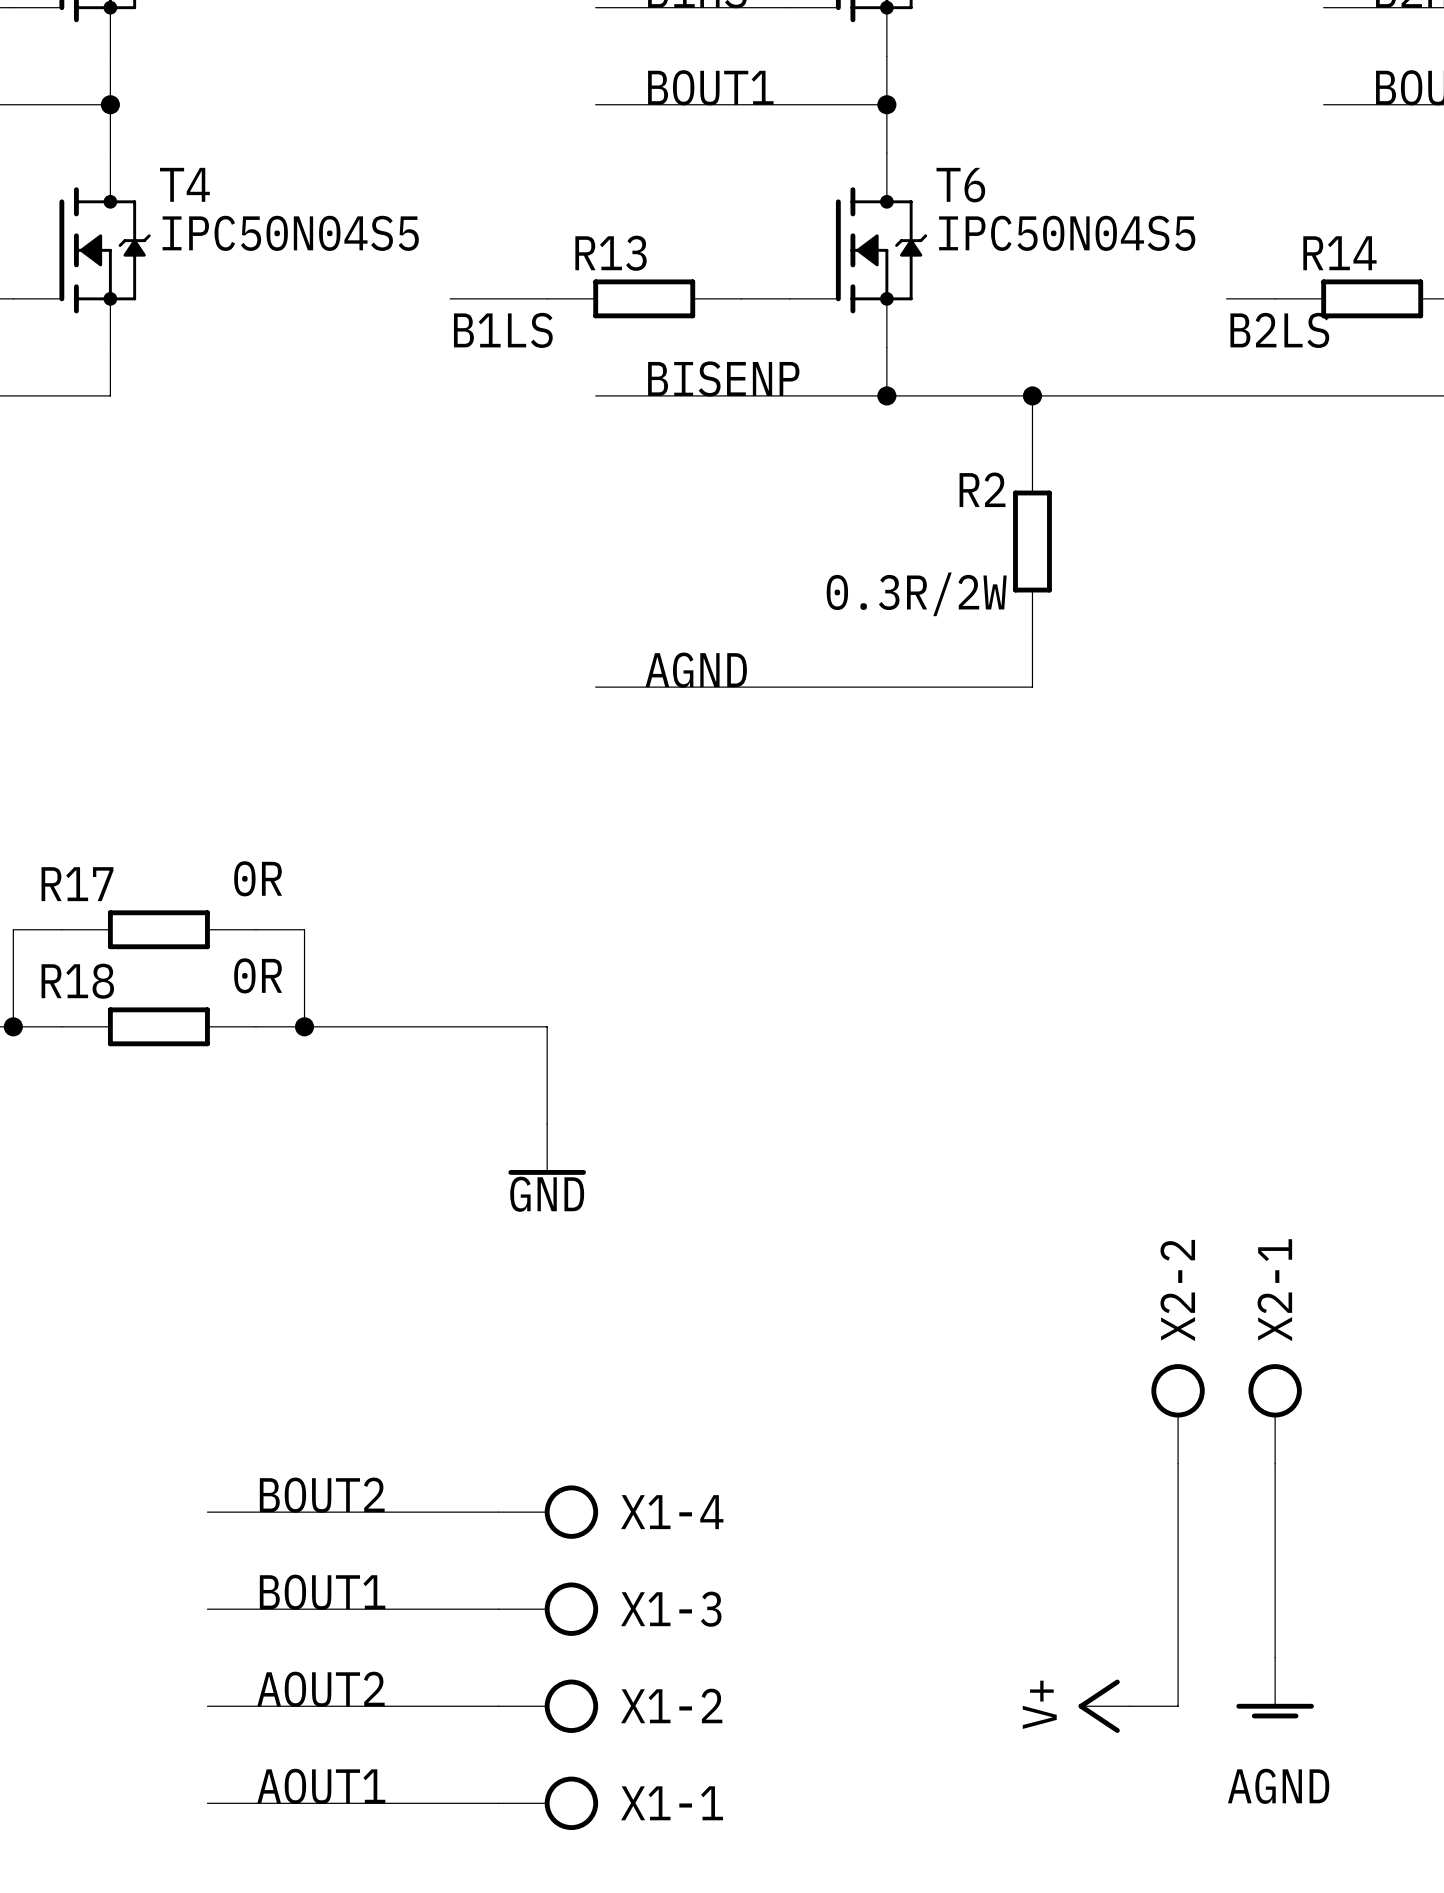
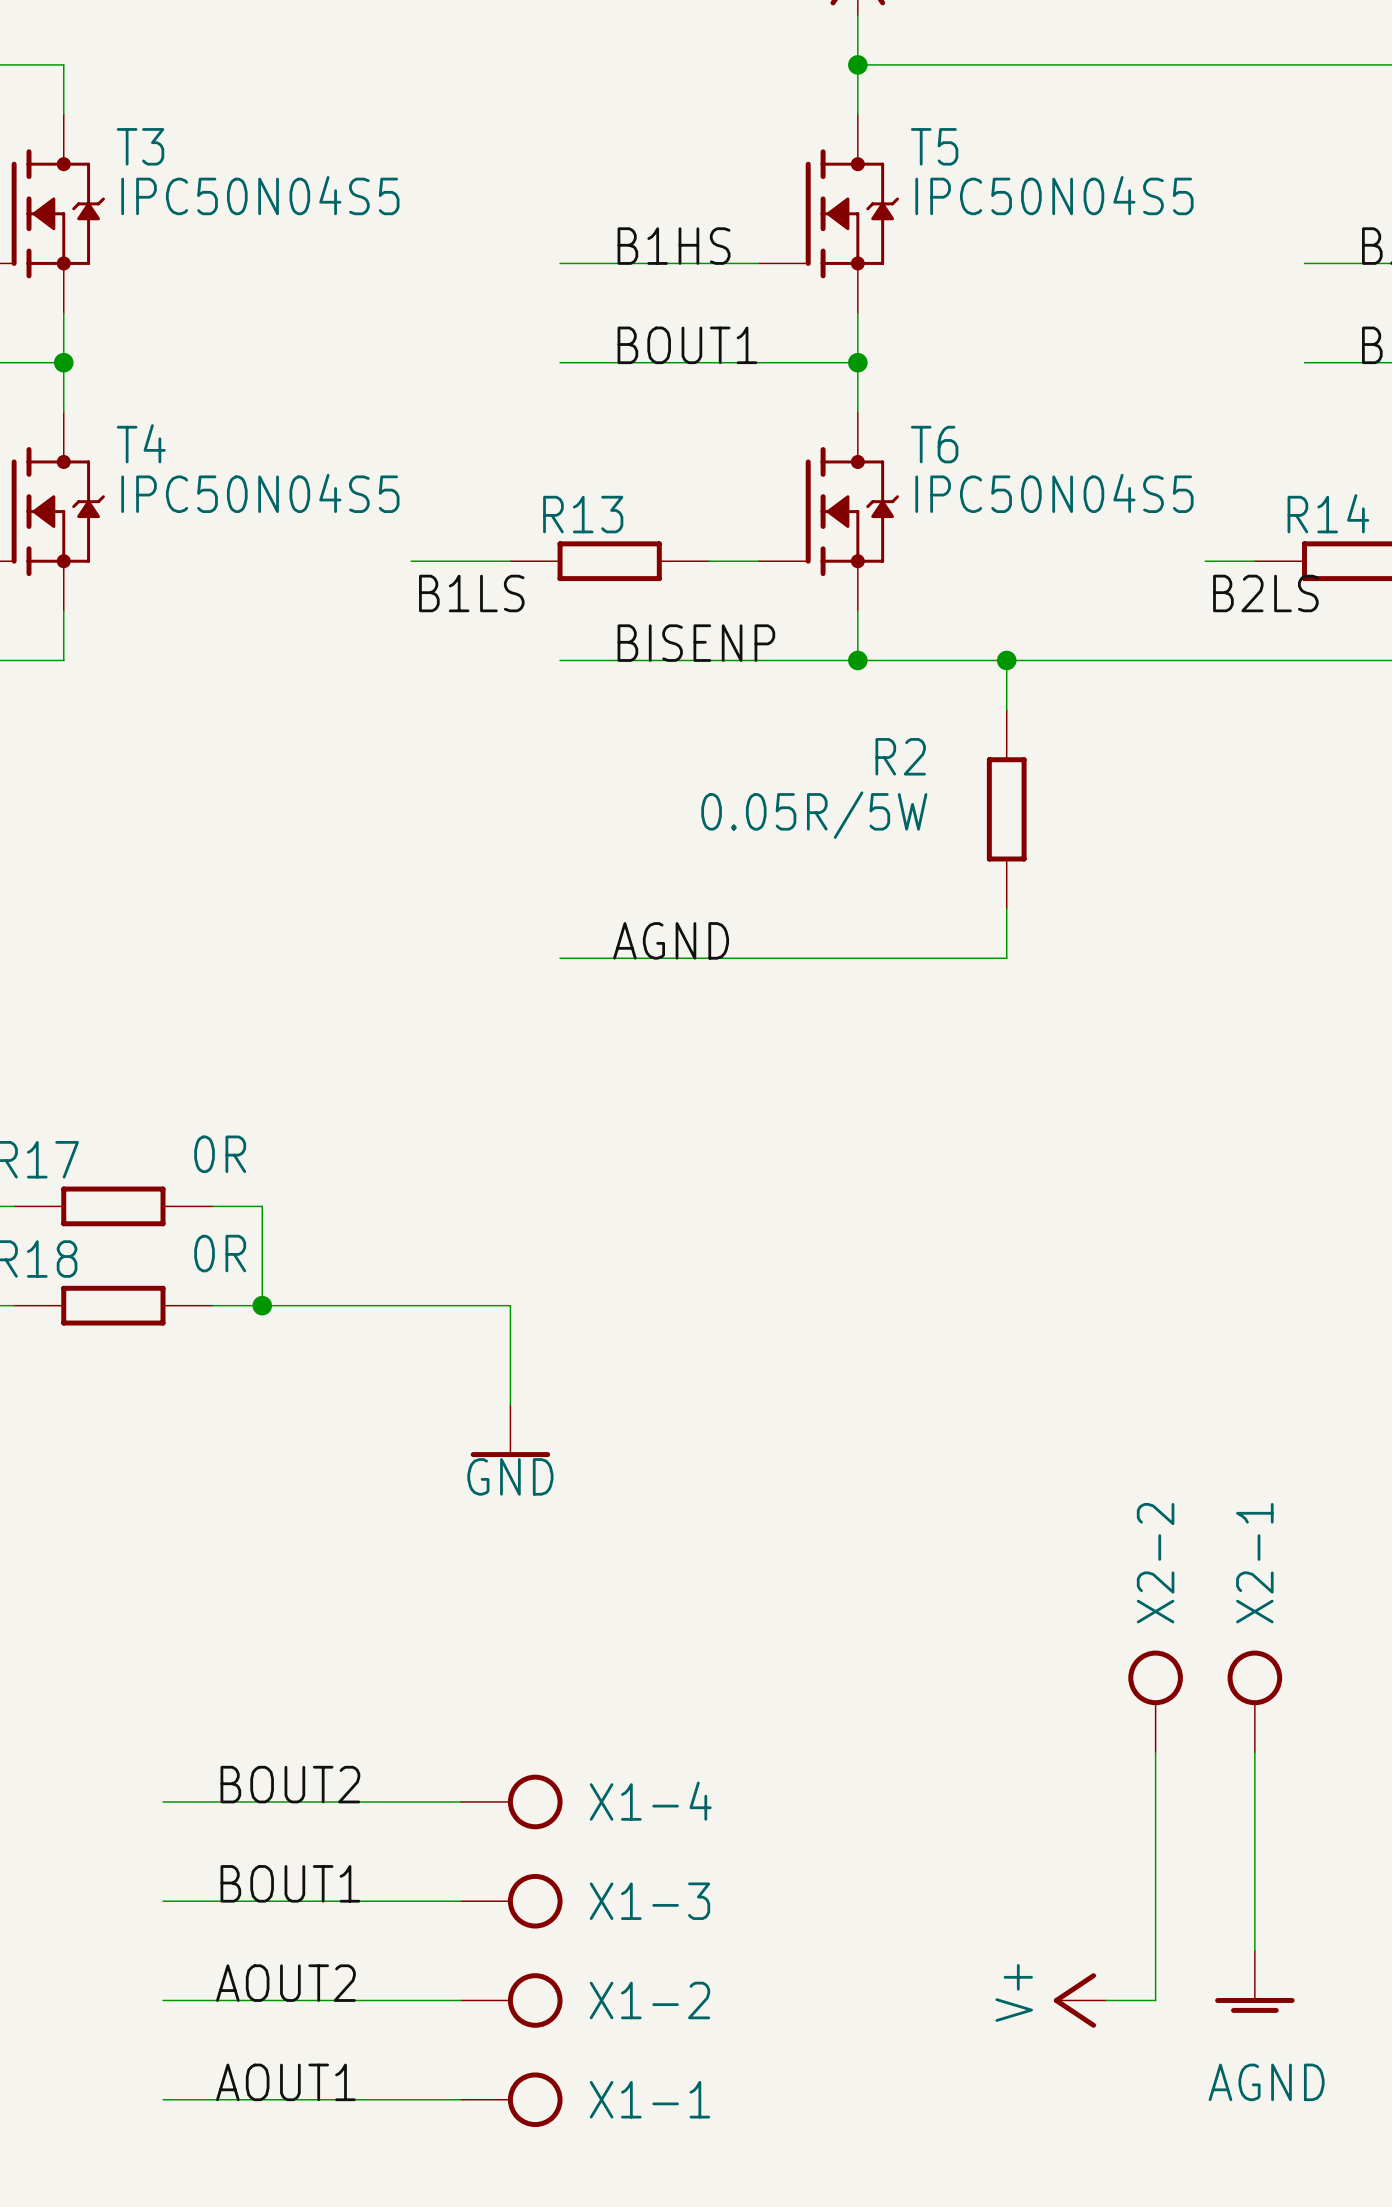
R2 name position: R2 (982, 489) -> R2 (900, 756)
R2 value: 0.3R/2W (916, 594) -> 0.05R/5W (814, 815)

